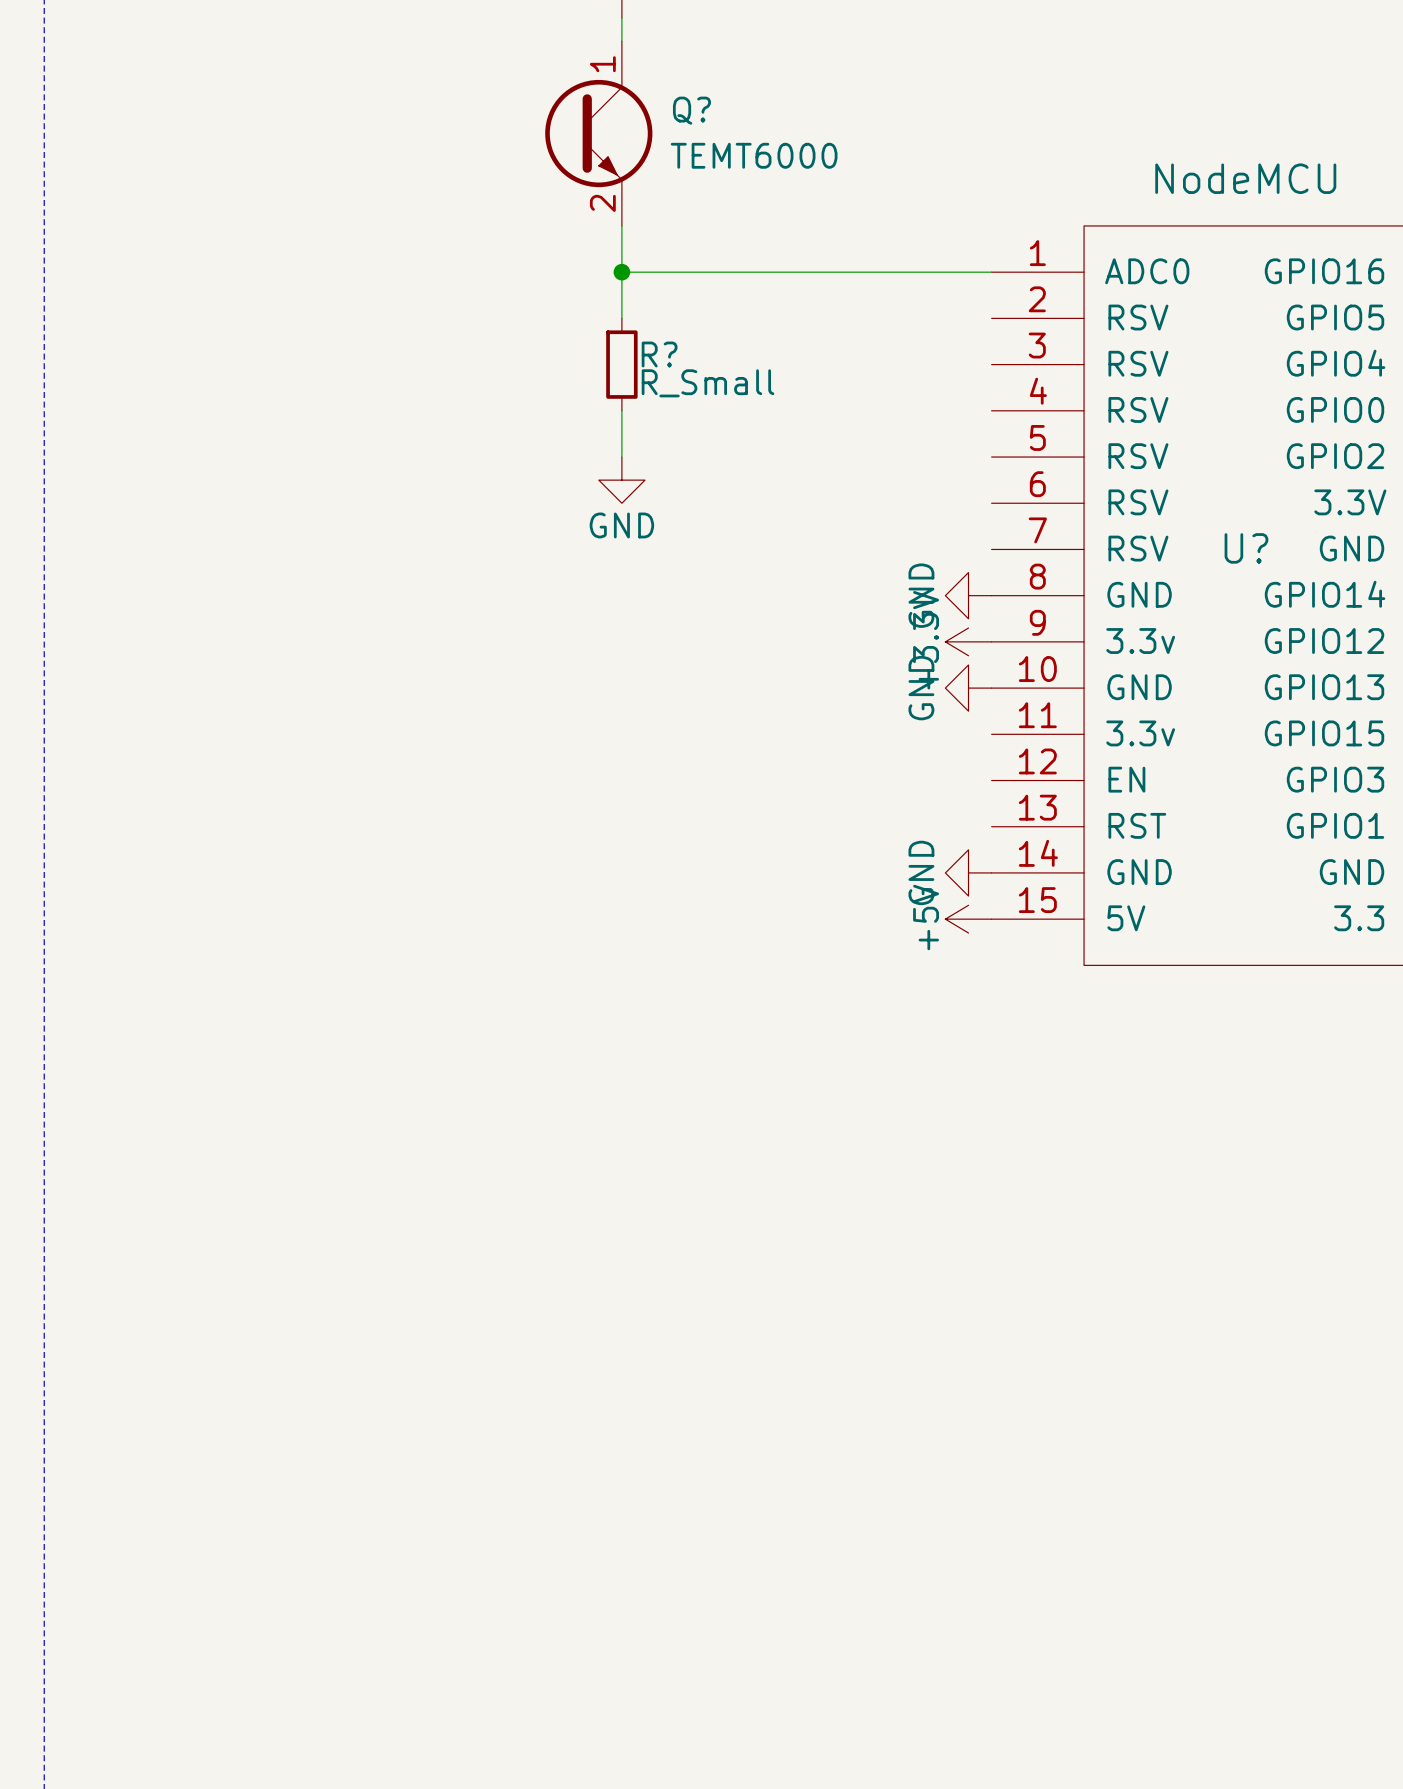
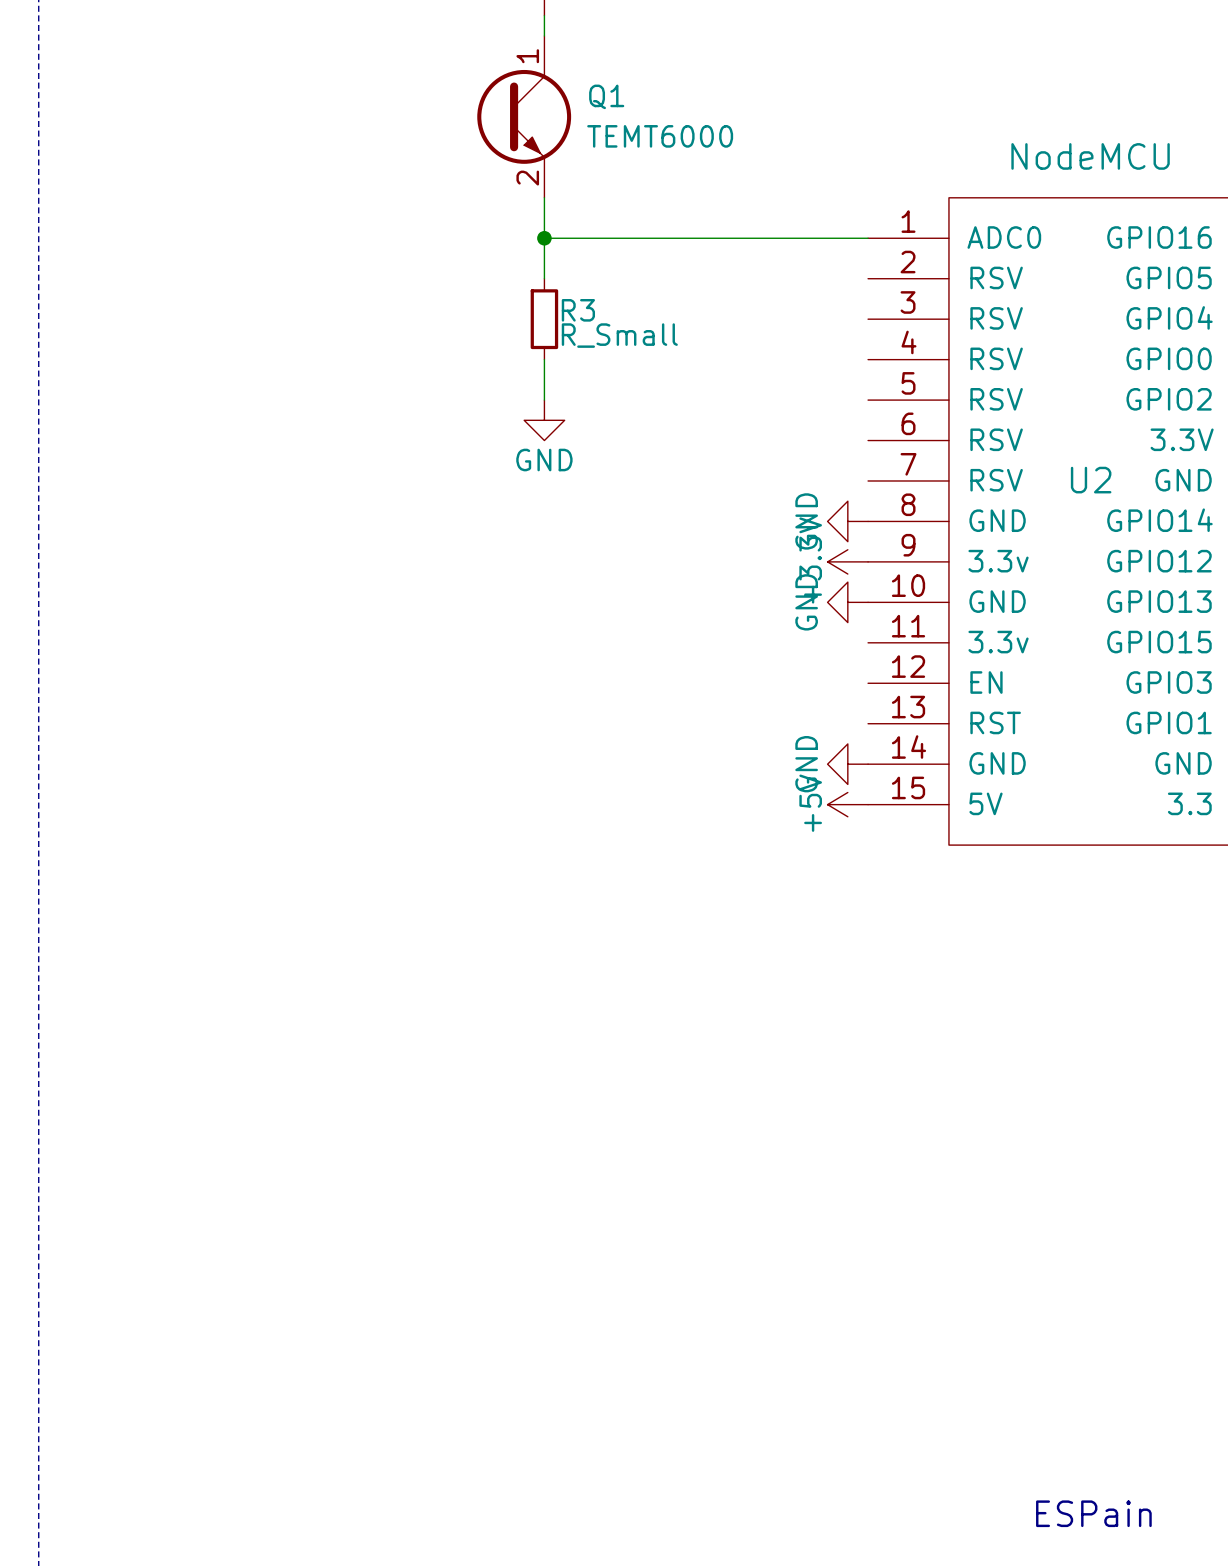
Q? name: Q? (691, 110) -> Q1 (606, 96)
R? name: R? (659, 354) -> R3 (578, 310)
U? name: U? (1246, 548) -> U2 (1091, 480)
text: none -> ESPain (1093, 1513)

